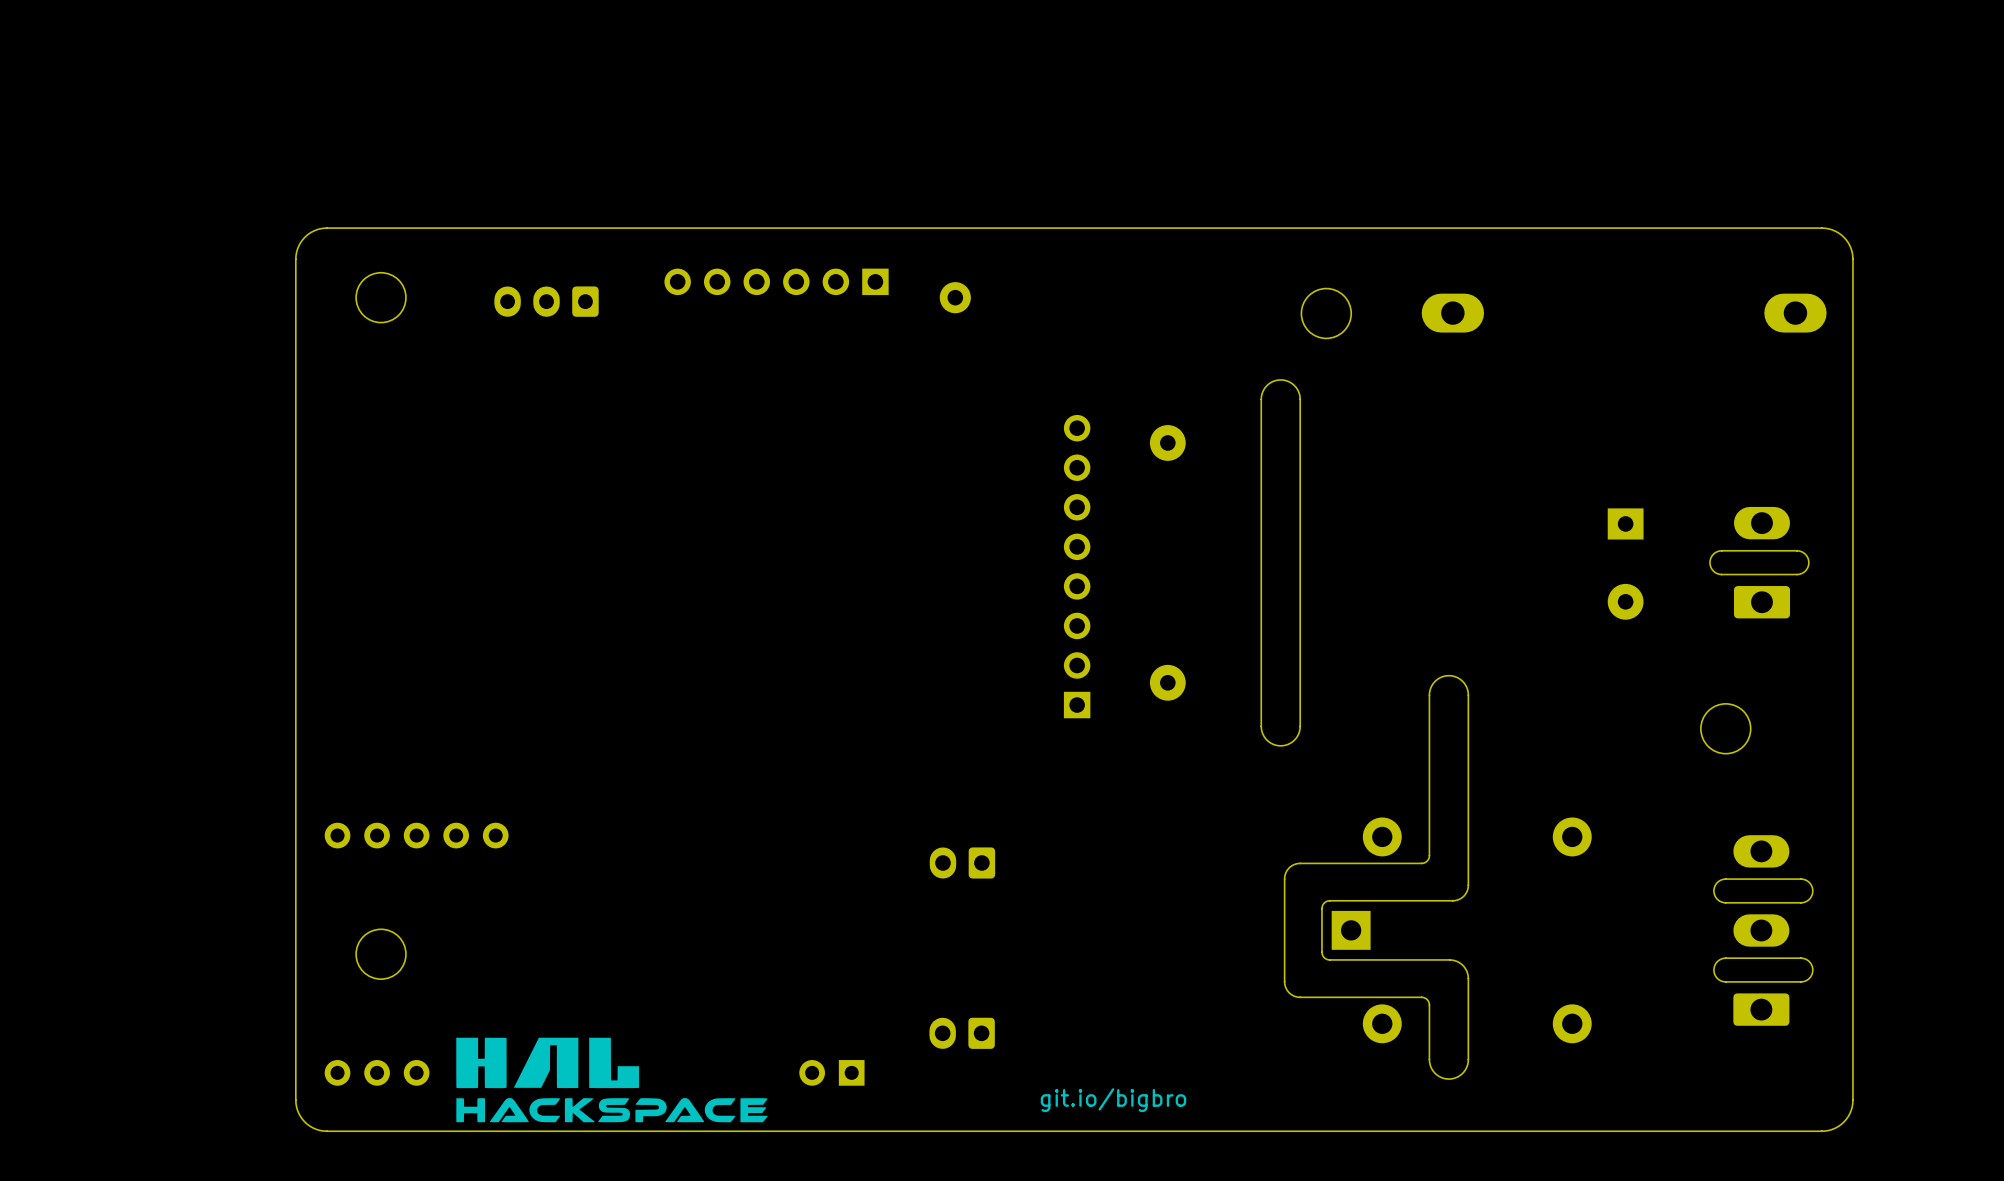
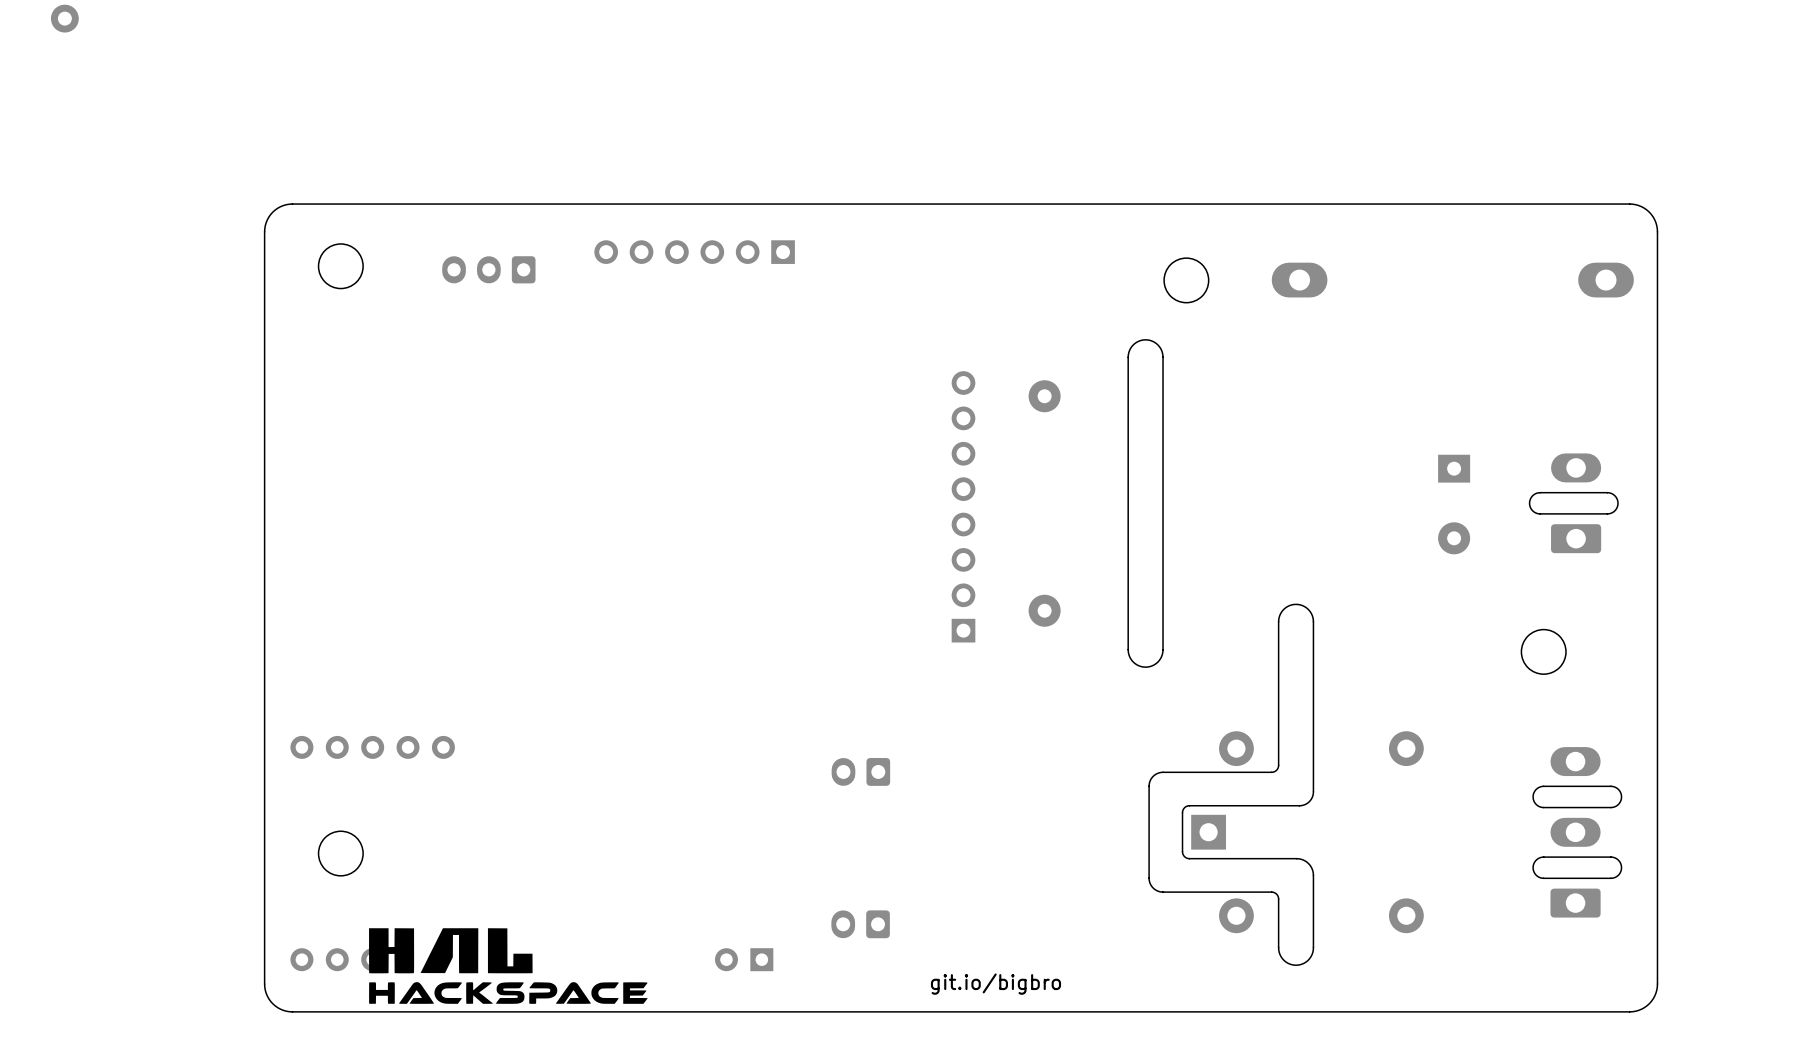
part: none -> (64, 18)
part: (955, 297) -> none
drawing position: (612, 1079) -> (508, 966)

